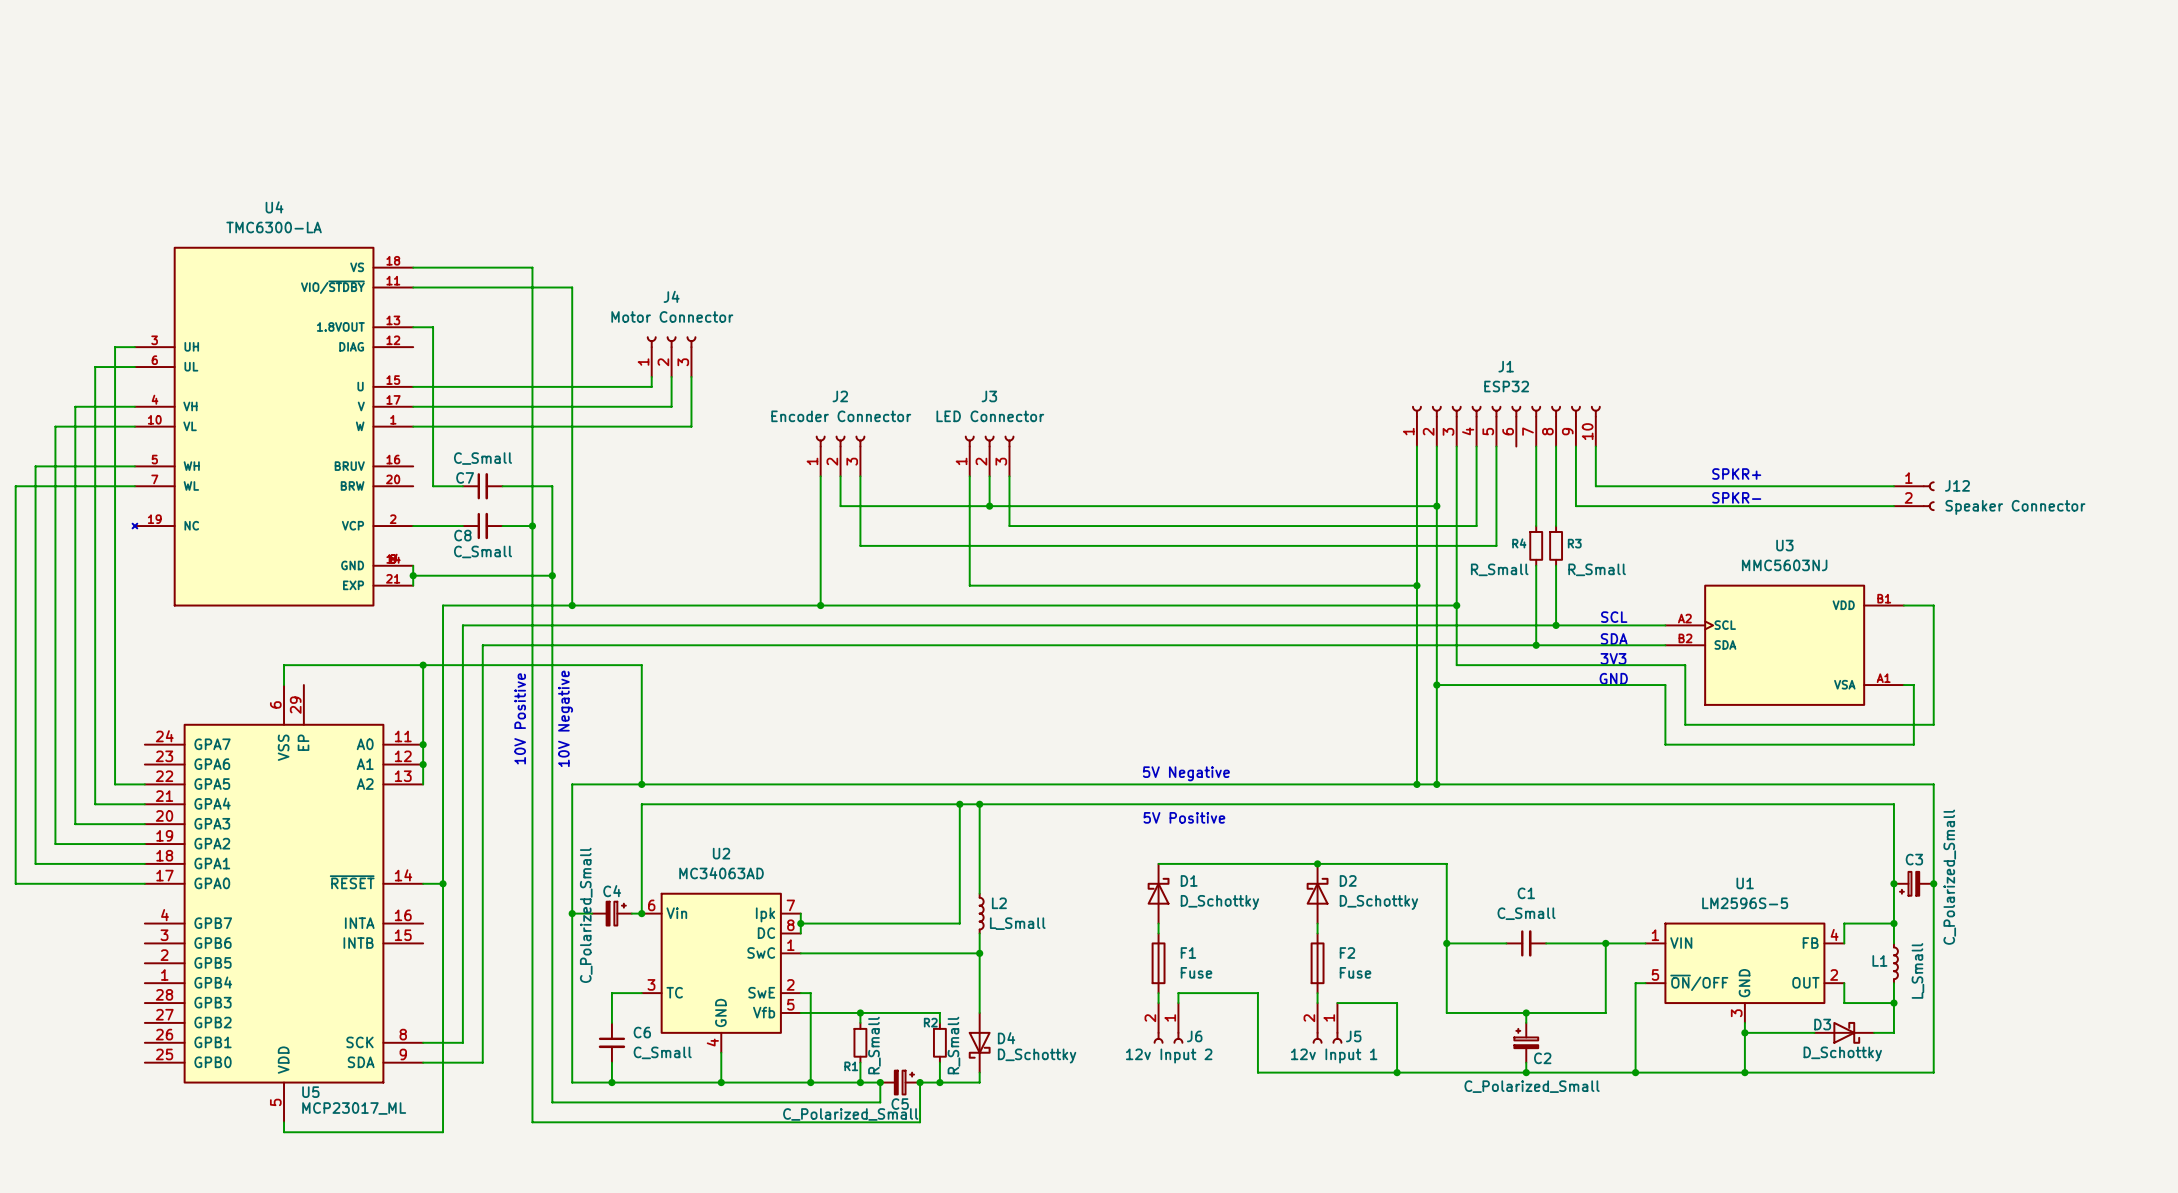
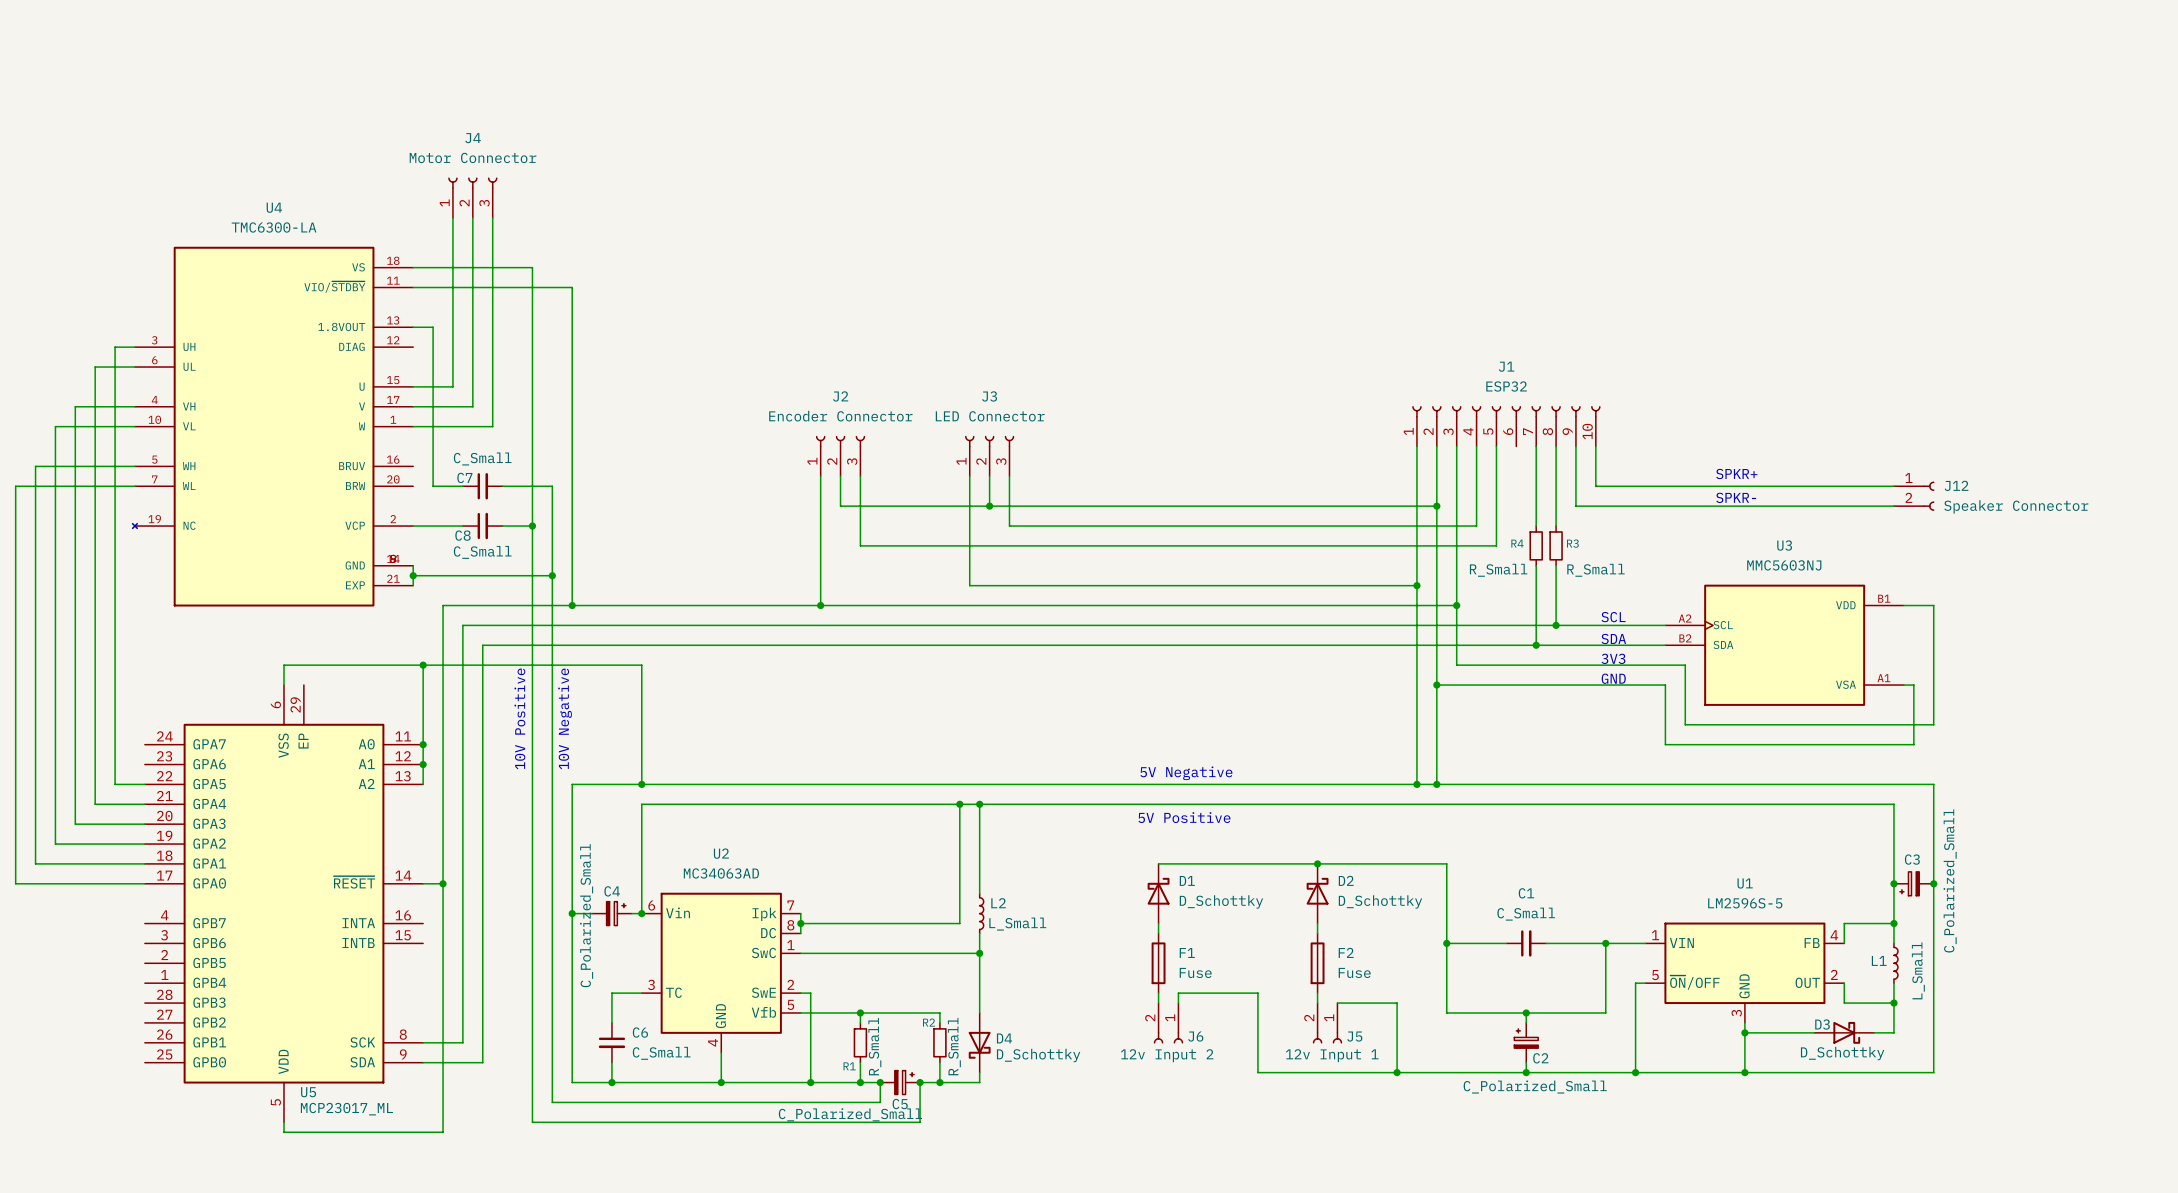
J4 position: (671, 356) -> (472, 197)
wire: (651, 376) (651, 386) (452, 386) -> (452, 217) (452, 386)
wire: (671, 376) (671, 406) (472, 406) -> (472, 217) (472, 406)
wire: (691, 376) (691, 426) (492, 426) -> (492, 217) (492, 426)

